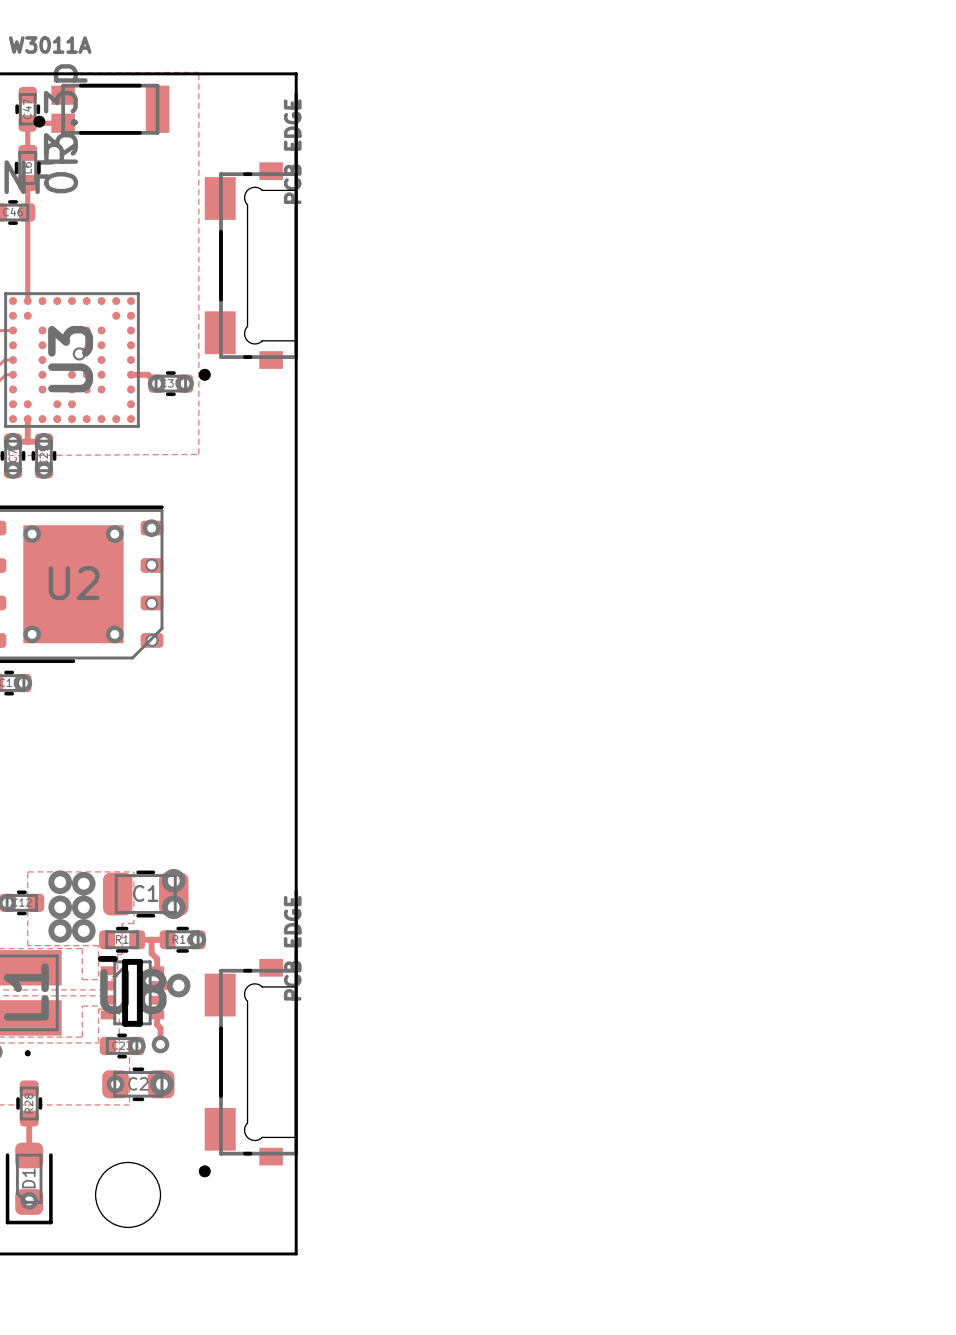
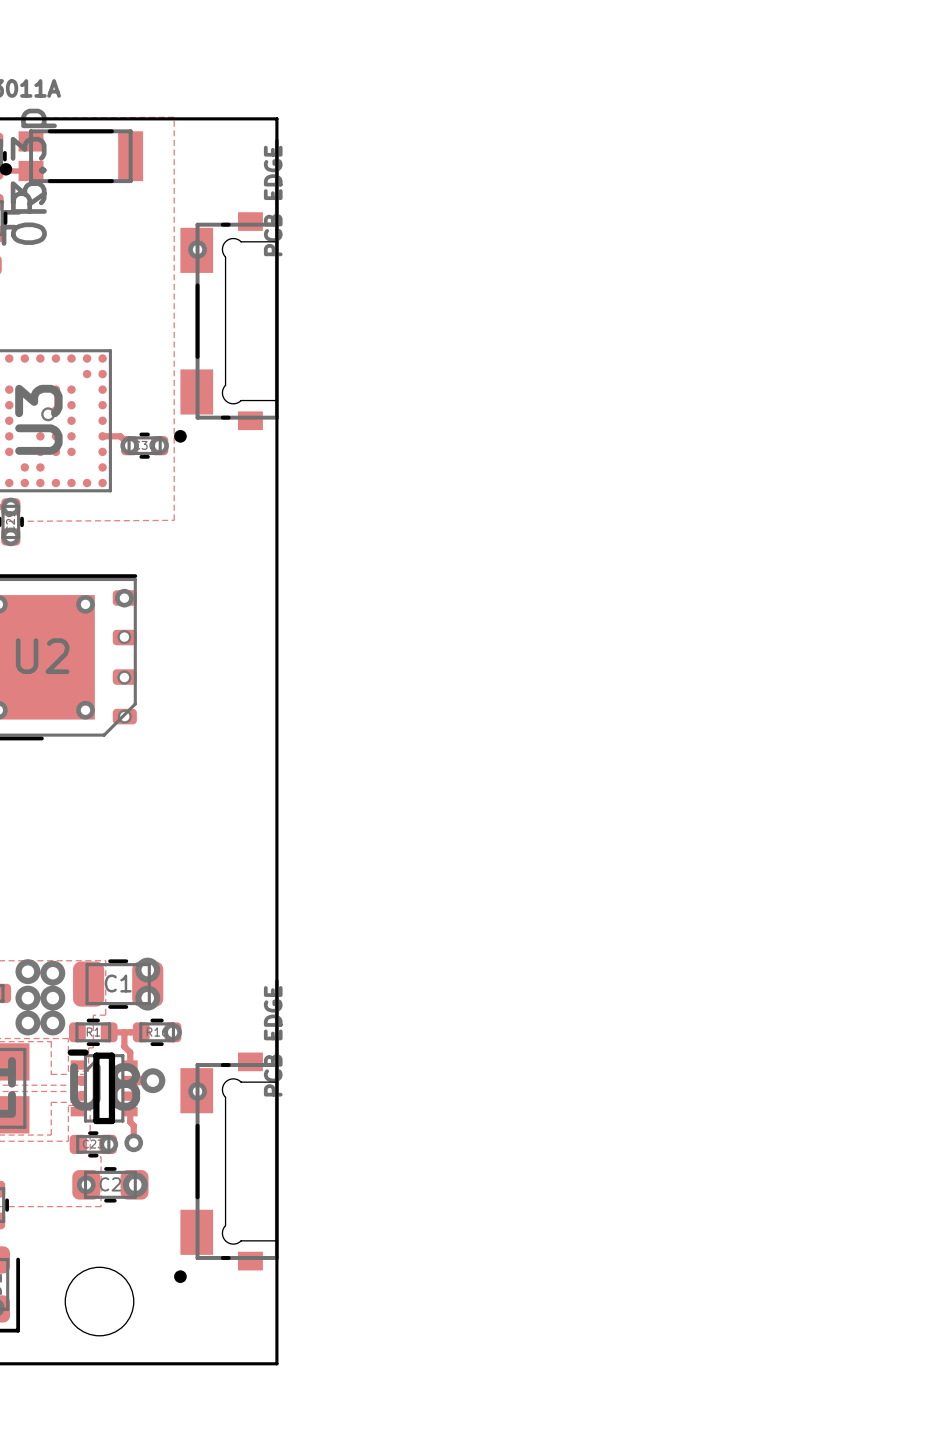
via: none -> (197, 249)
via: none -> (197, 1091)

